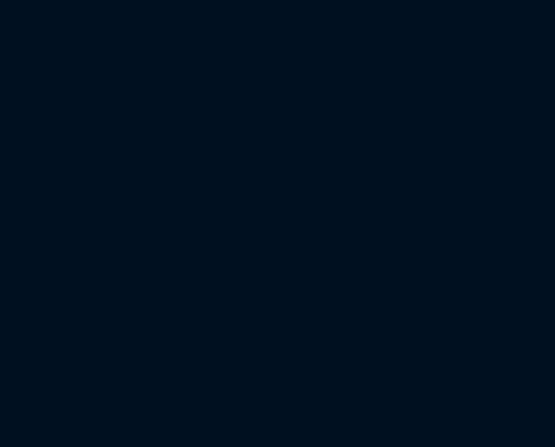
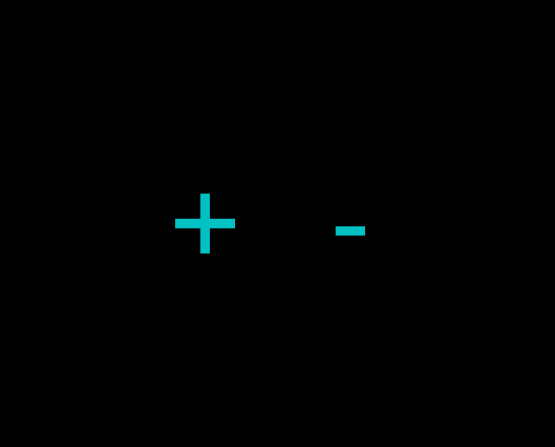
text: none -> + (205, 223)
text: none -> - (350, 230)

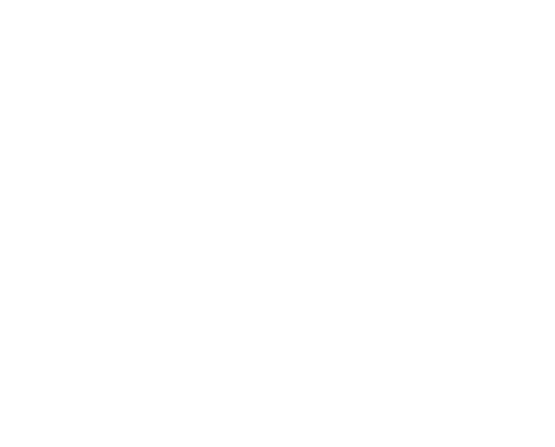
text: + (205, 223) -> none
text: - (350, 230) -> none

